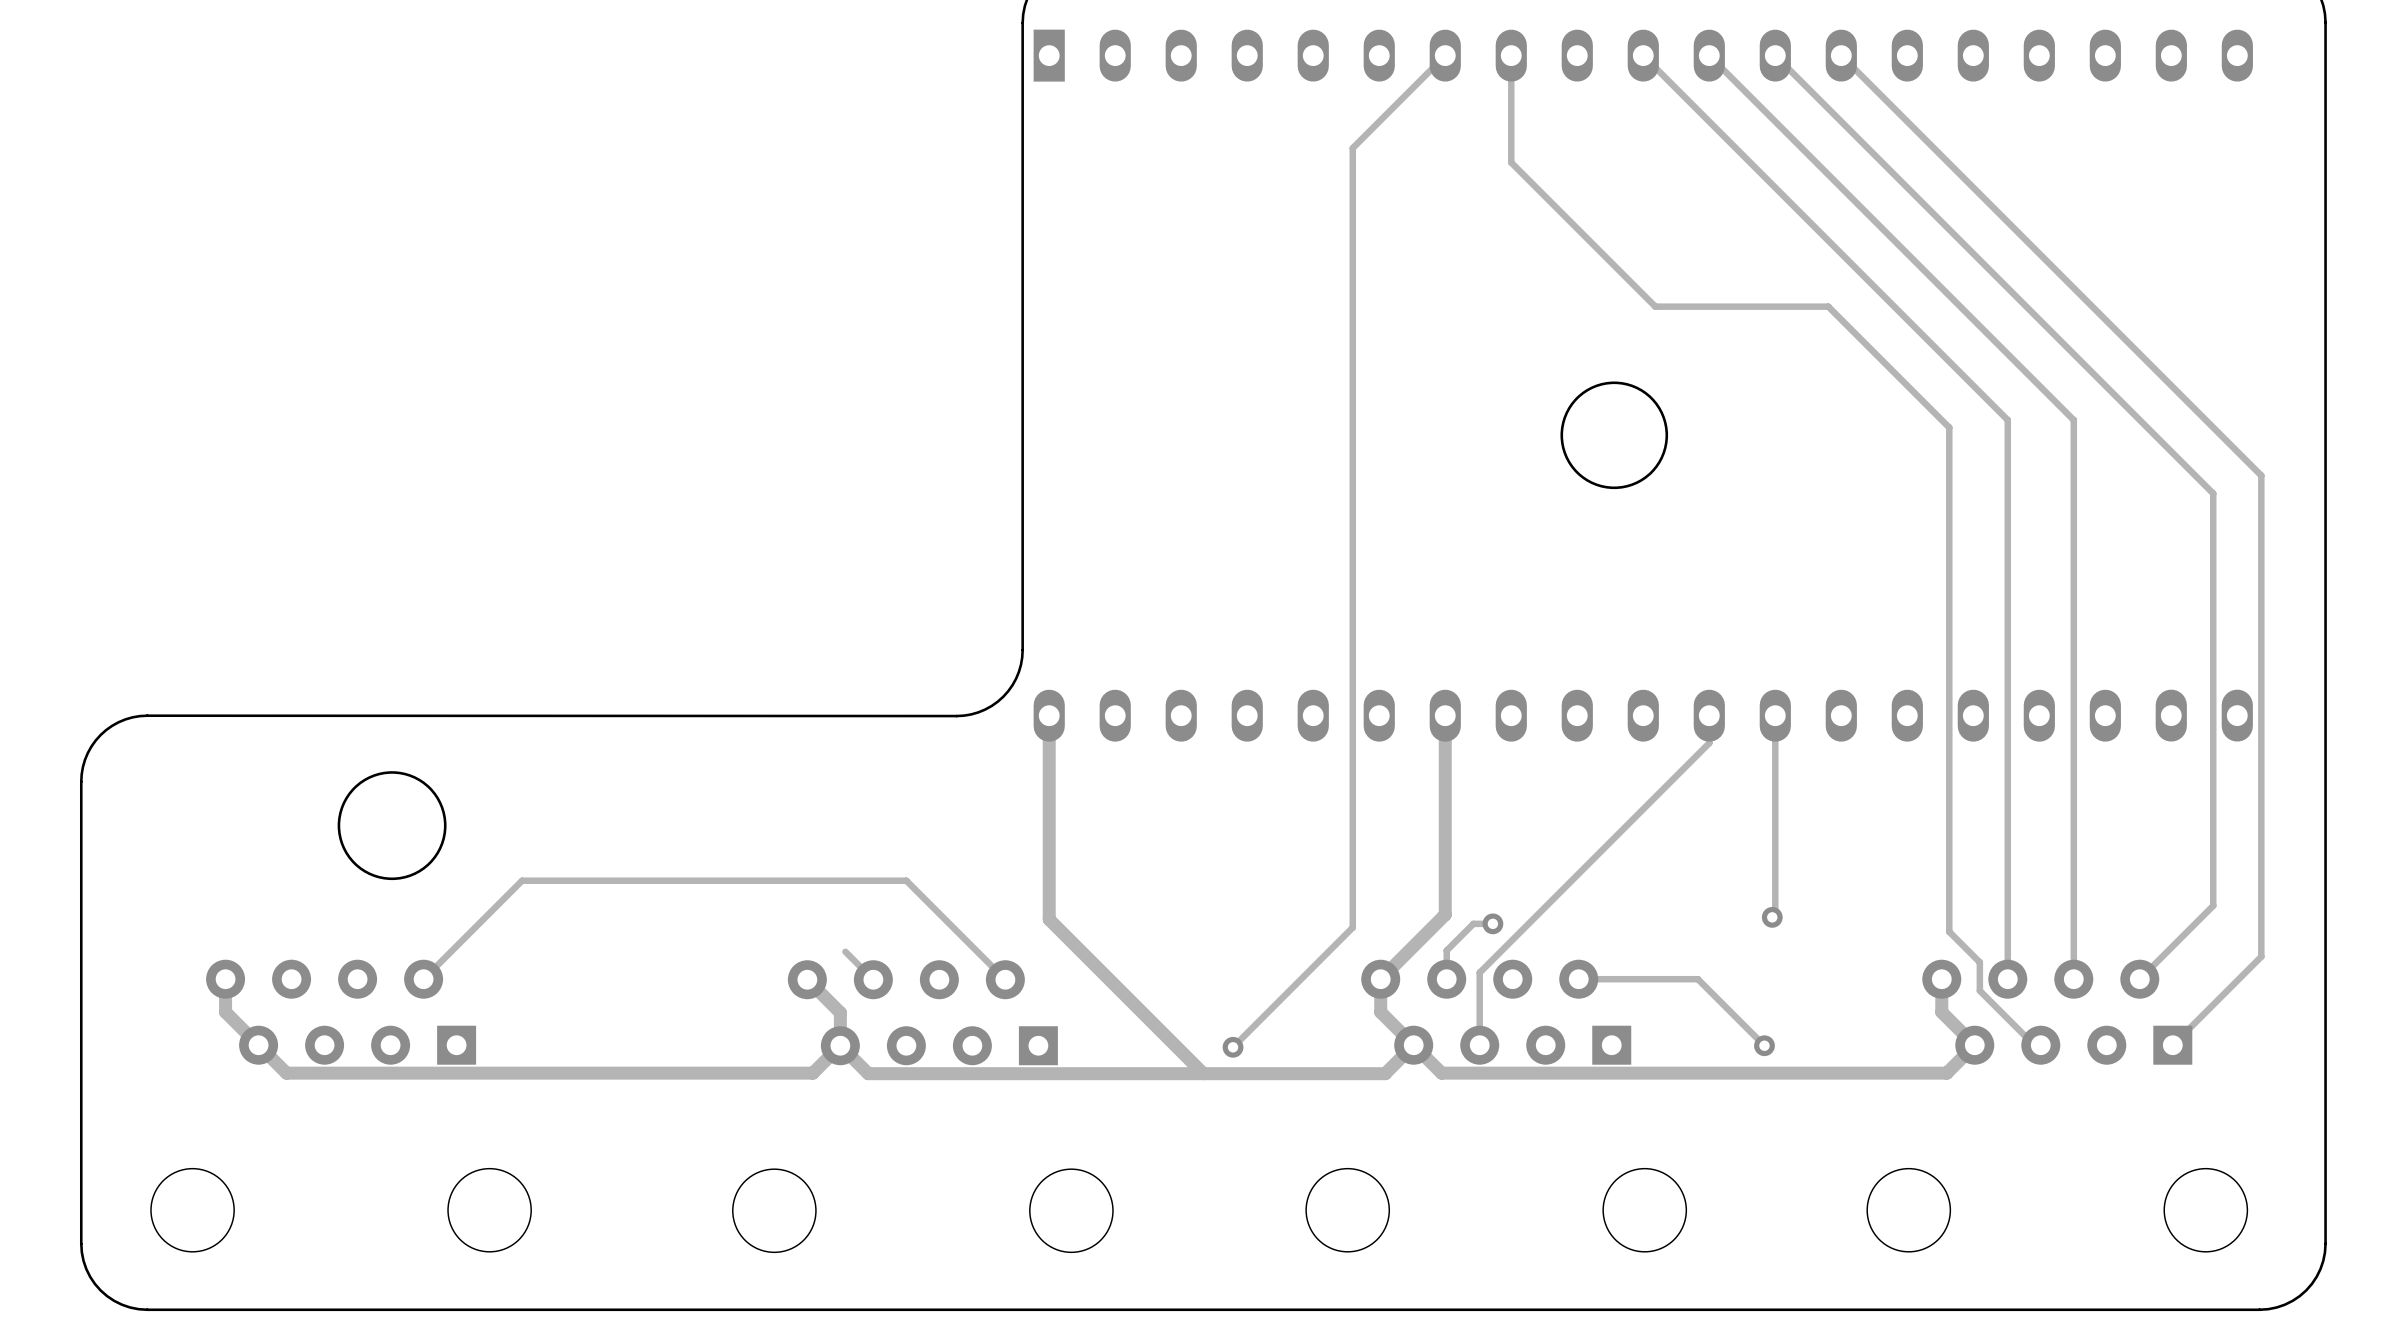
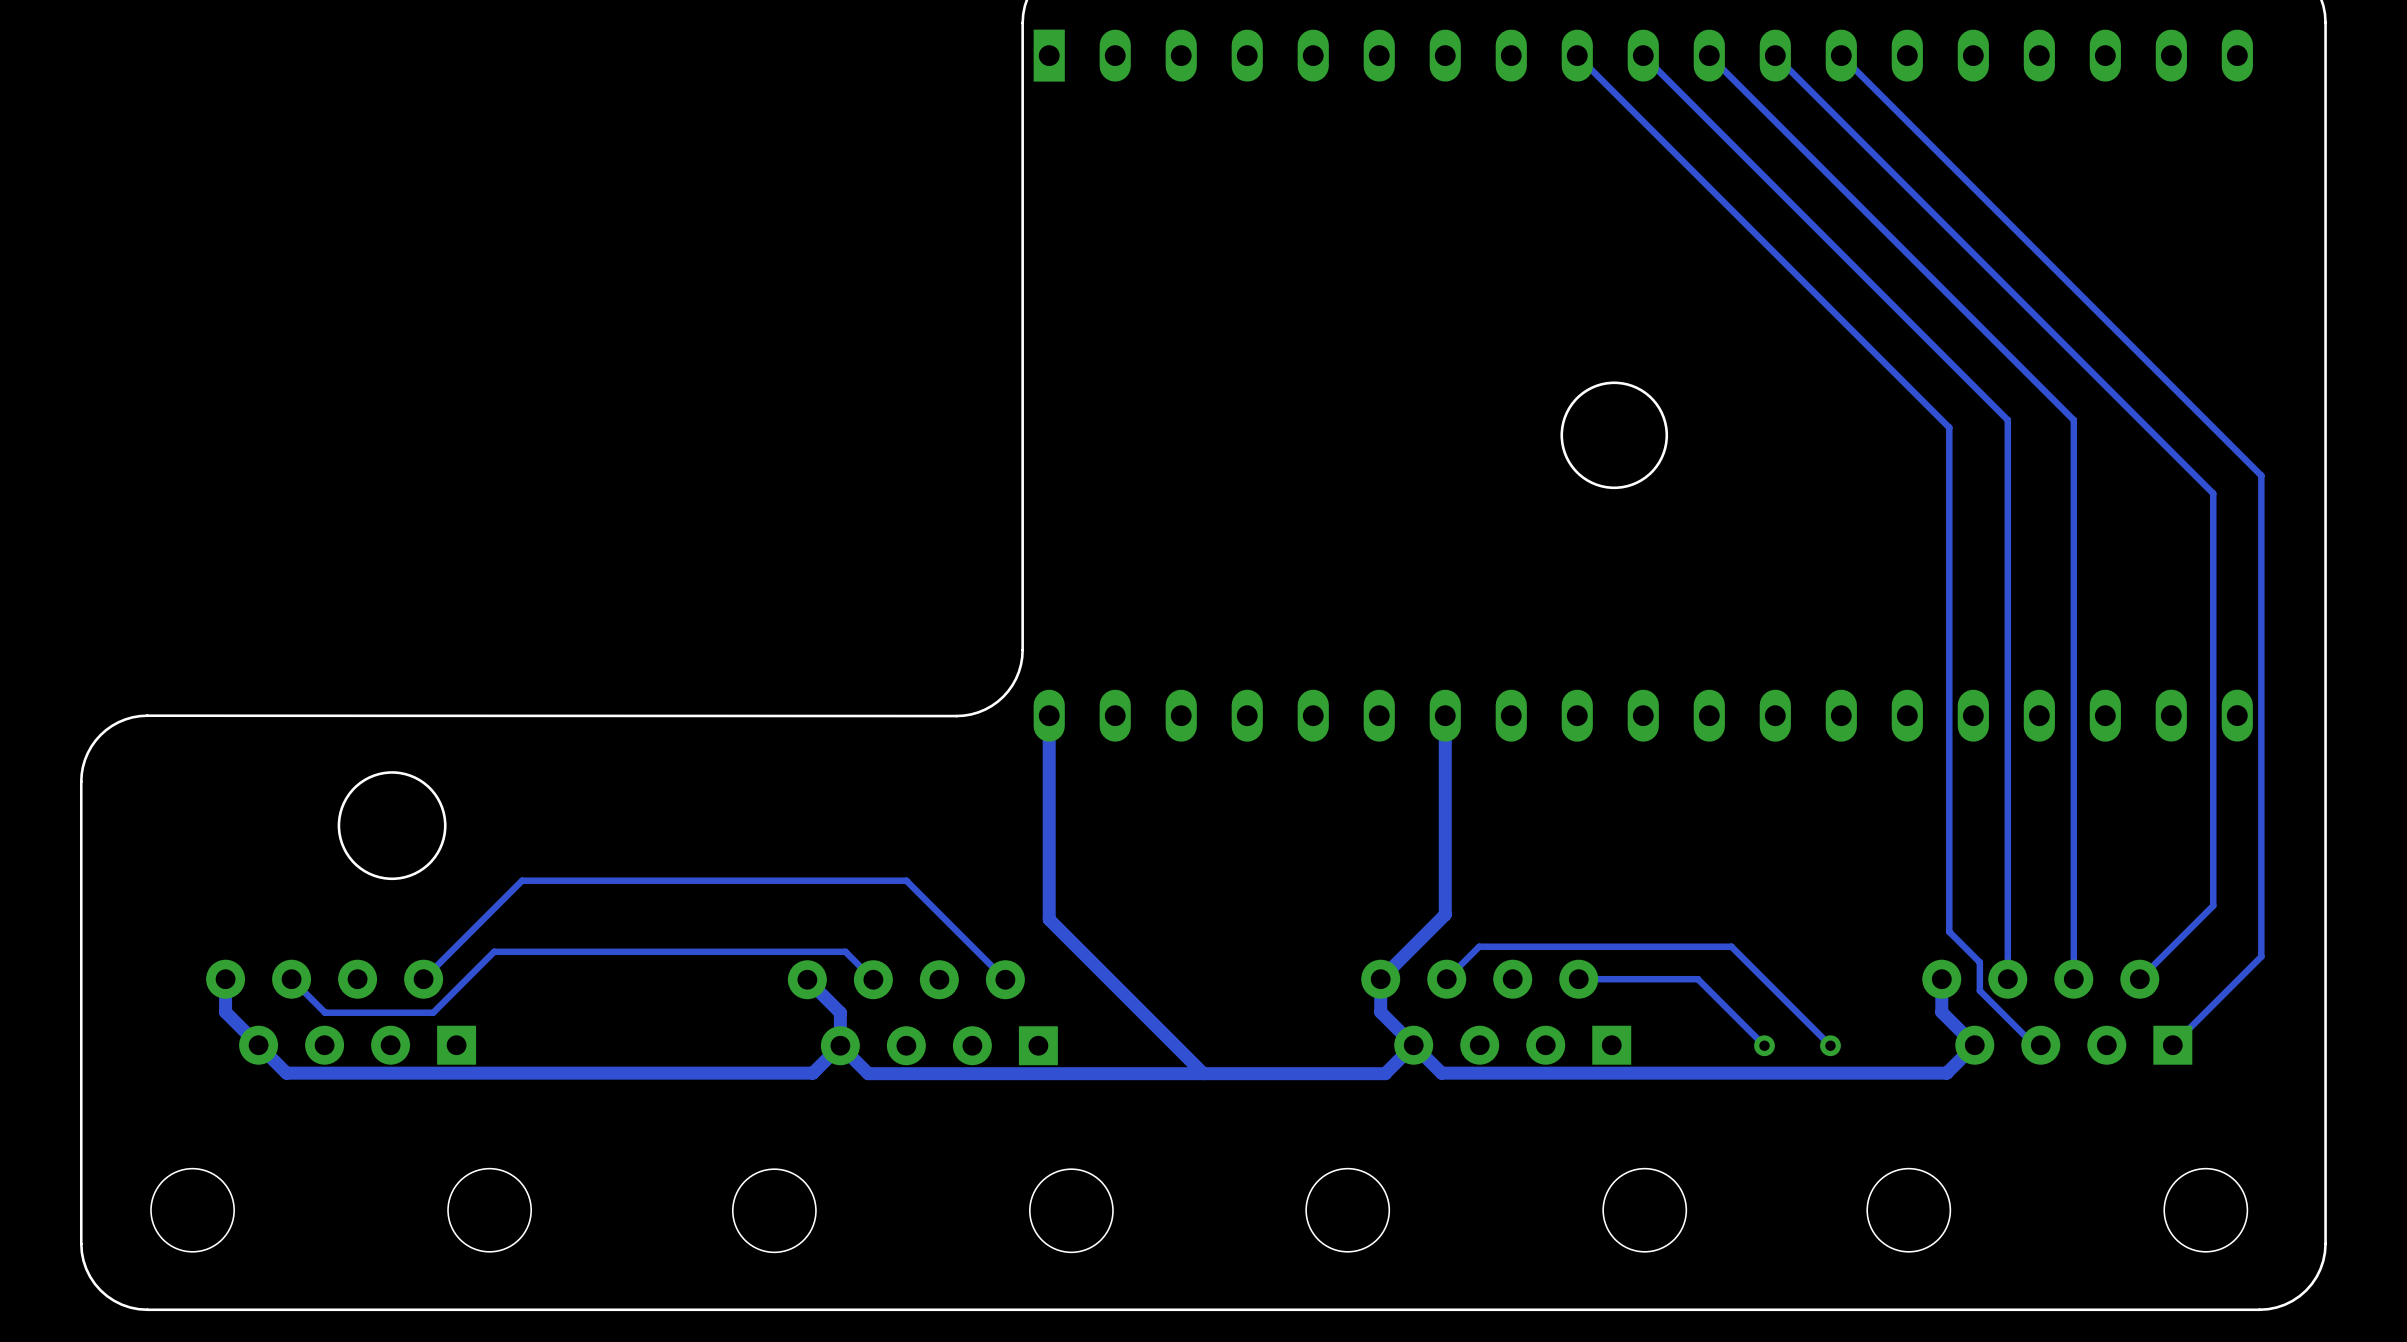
track: (1445, 55) (1352, 148) (1352, 927) (1233, 1047) -> none
track: (1511, 55) (1511, 162) (1655, 306) (1828, 306) -> (1577, 55) (1828, 306)
track: (1709, 715) (1709, 743) (1479, 972) (1479, 1045) -> none
track: (1775, 715) (1775, 914) (1772, 917) -> none
via position: (1772, 917) -> (1830, 1045)
track: (1492, 923) (1473, 923) (1446, 950) (1446, 979) -> (1830, 1045) (1731, 946) (1479, 946) (1446, 979)
via: (1492, 923) -> none
track: none -> (845, 951) (494, 951) (433, 1012) (325, 1012) (291, 979)
via: (1233, 1047) -> none

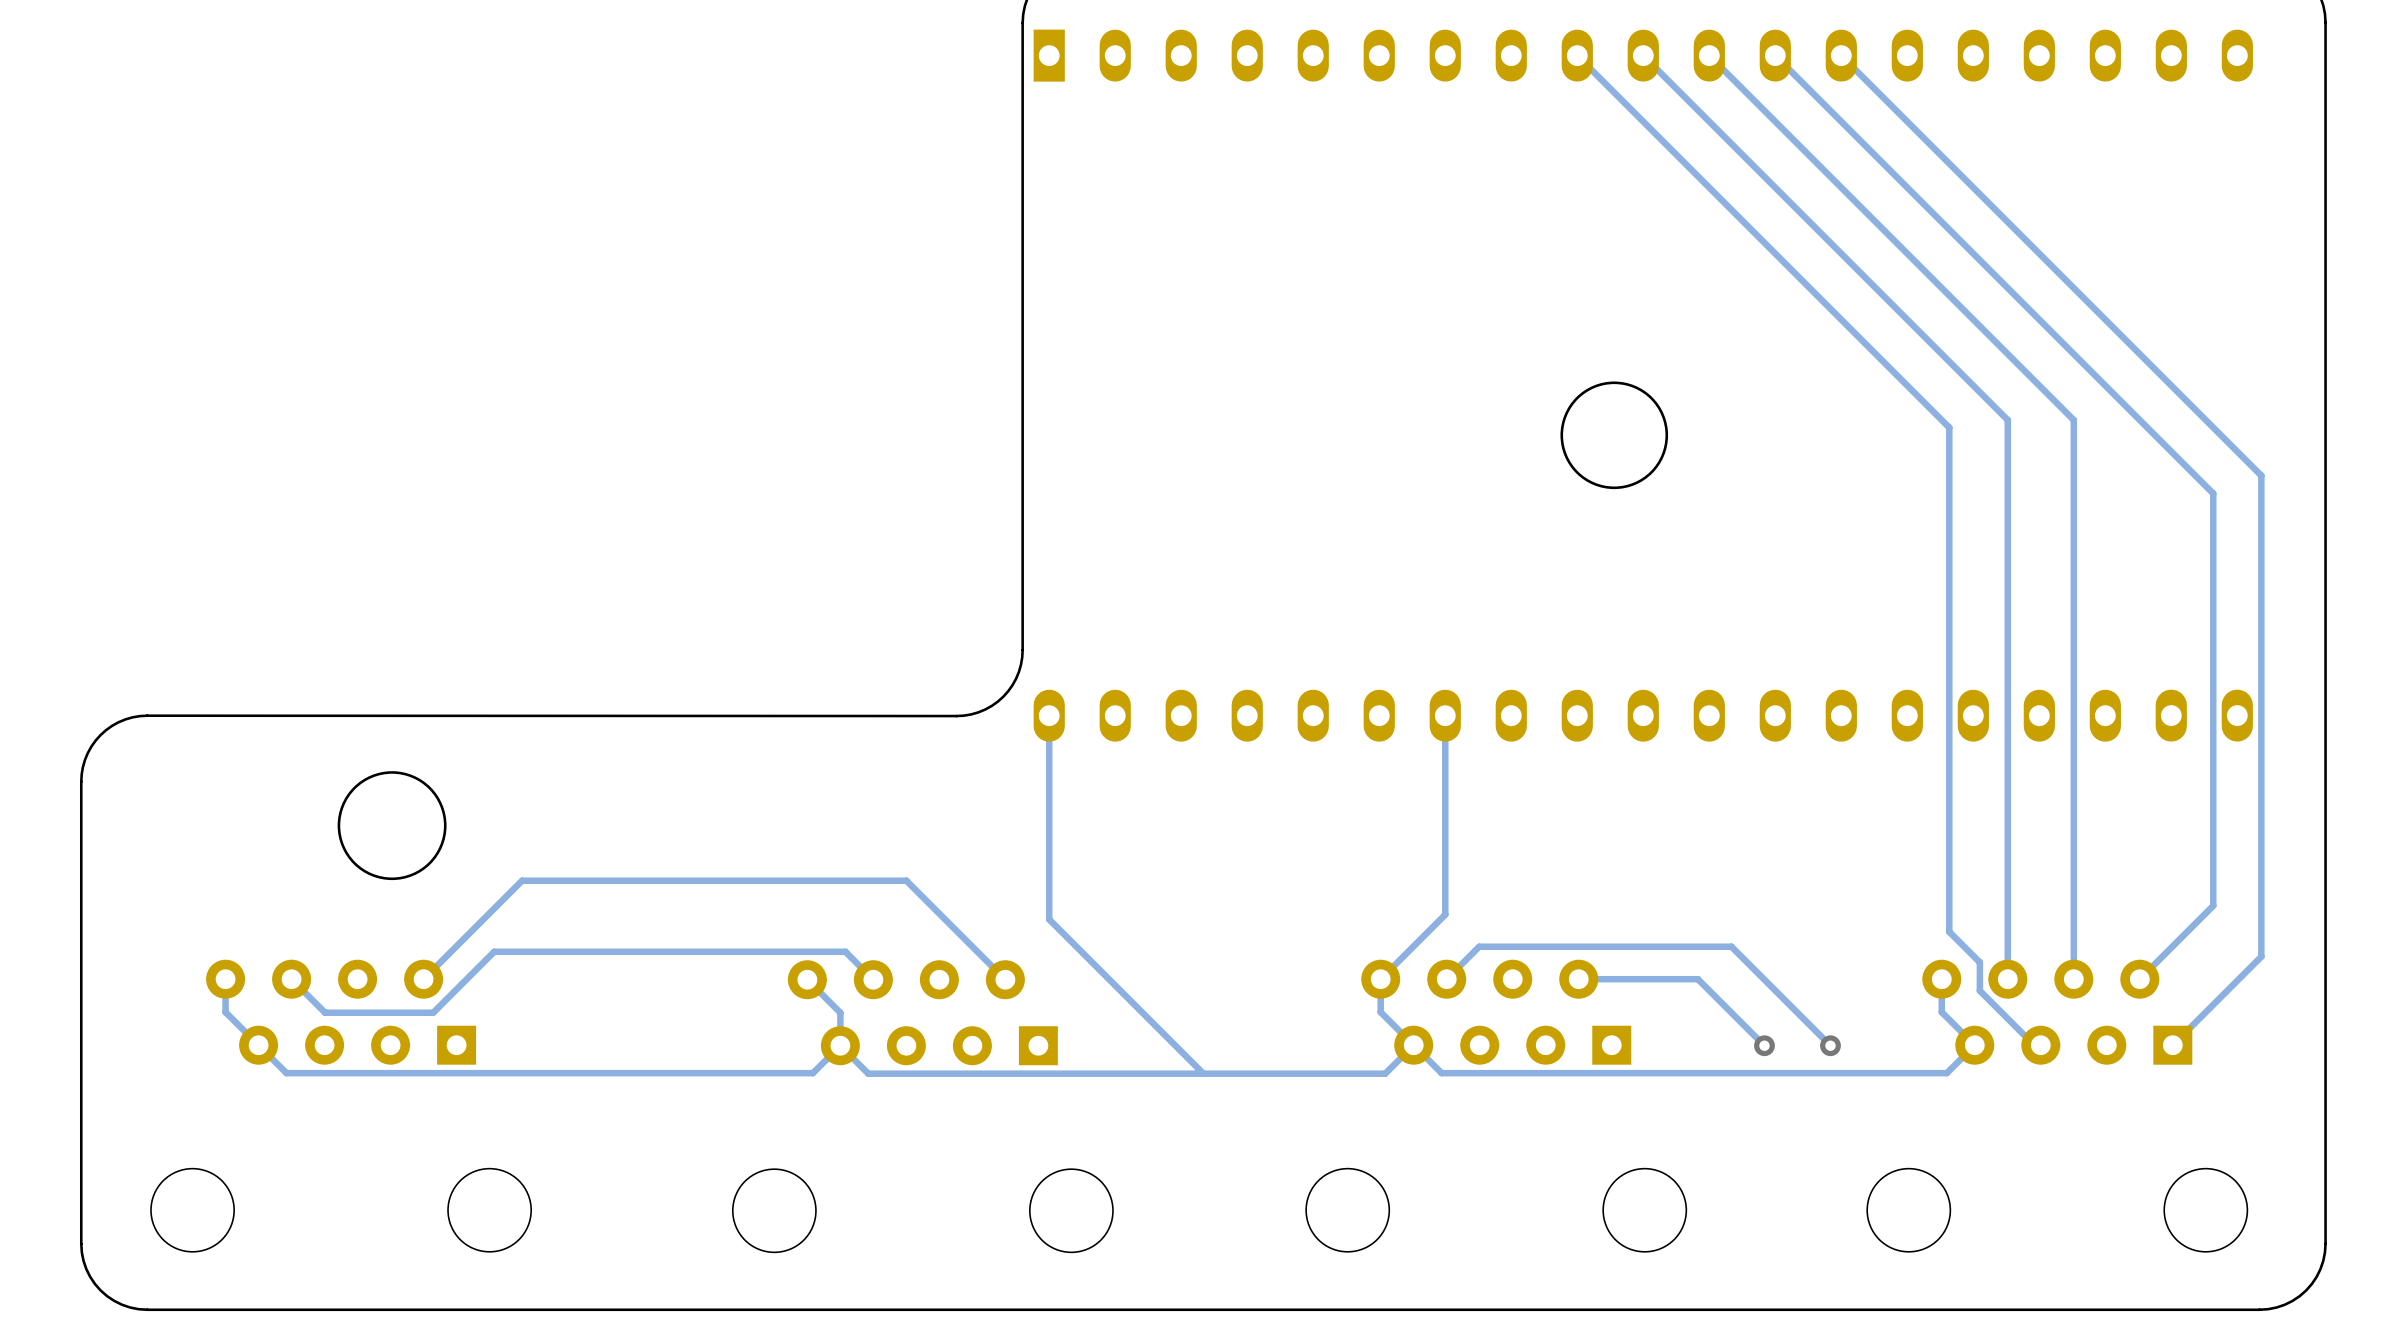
track width: thick (1049, 715) (1049, 919) (1203, 1073) -> thin (1049, 715) (1049, 919) (1203, 1073)
track width: thick (1445, 715) (1445, 914) (1380, 979) (1380, 1012) (1441, 1073) (1946, 1073) (1974, 1045) (1941, 1012) (1941, 979) -> thin (1445, 715) (1445, 914) (1380, 979) (1380, 1012) (1441, 1073) (1946, 1073) (1974, 1045) (1941, 1012) (1941, 979)
track width: thick (225, 979) (225, 1012) (286, 1073) (812, 1073) (840, 1045) -> thin (225, 979) (225, 1012) (286, 1073) (812, 1073) (840, 1045)
track width: thick (807, 979) (840, 1012) (840, 1045) -> thin (807, 979) (840, 1012) (840, 1045)
track width: thick (1413, 1045) (1385, 1073) (868, 1073) (840, 1045) -> thin (1413, 1045) (1385, 1073) (868, 1073) (840, 1045)

